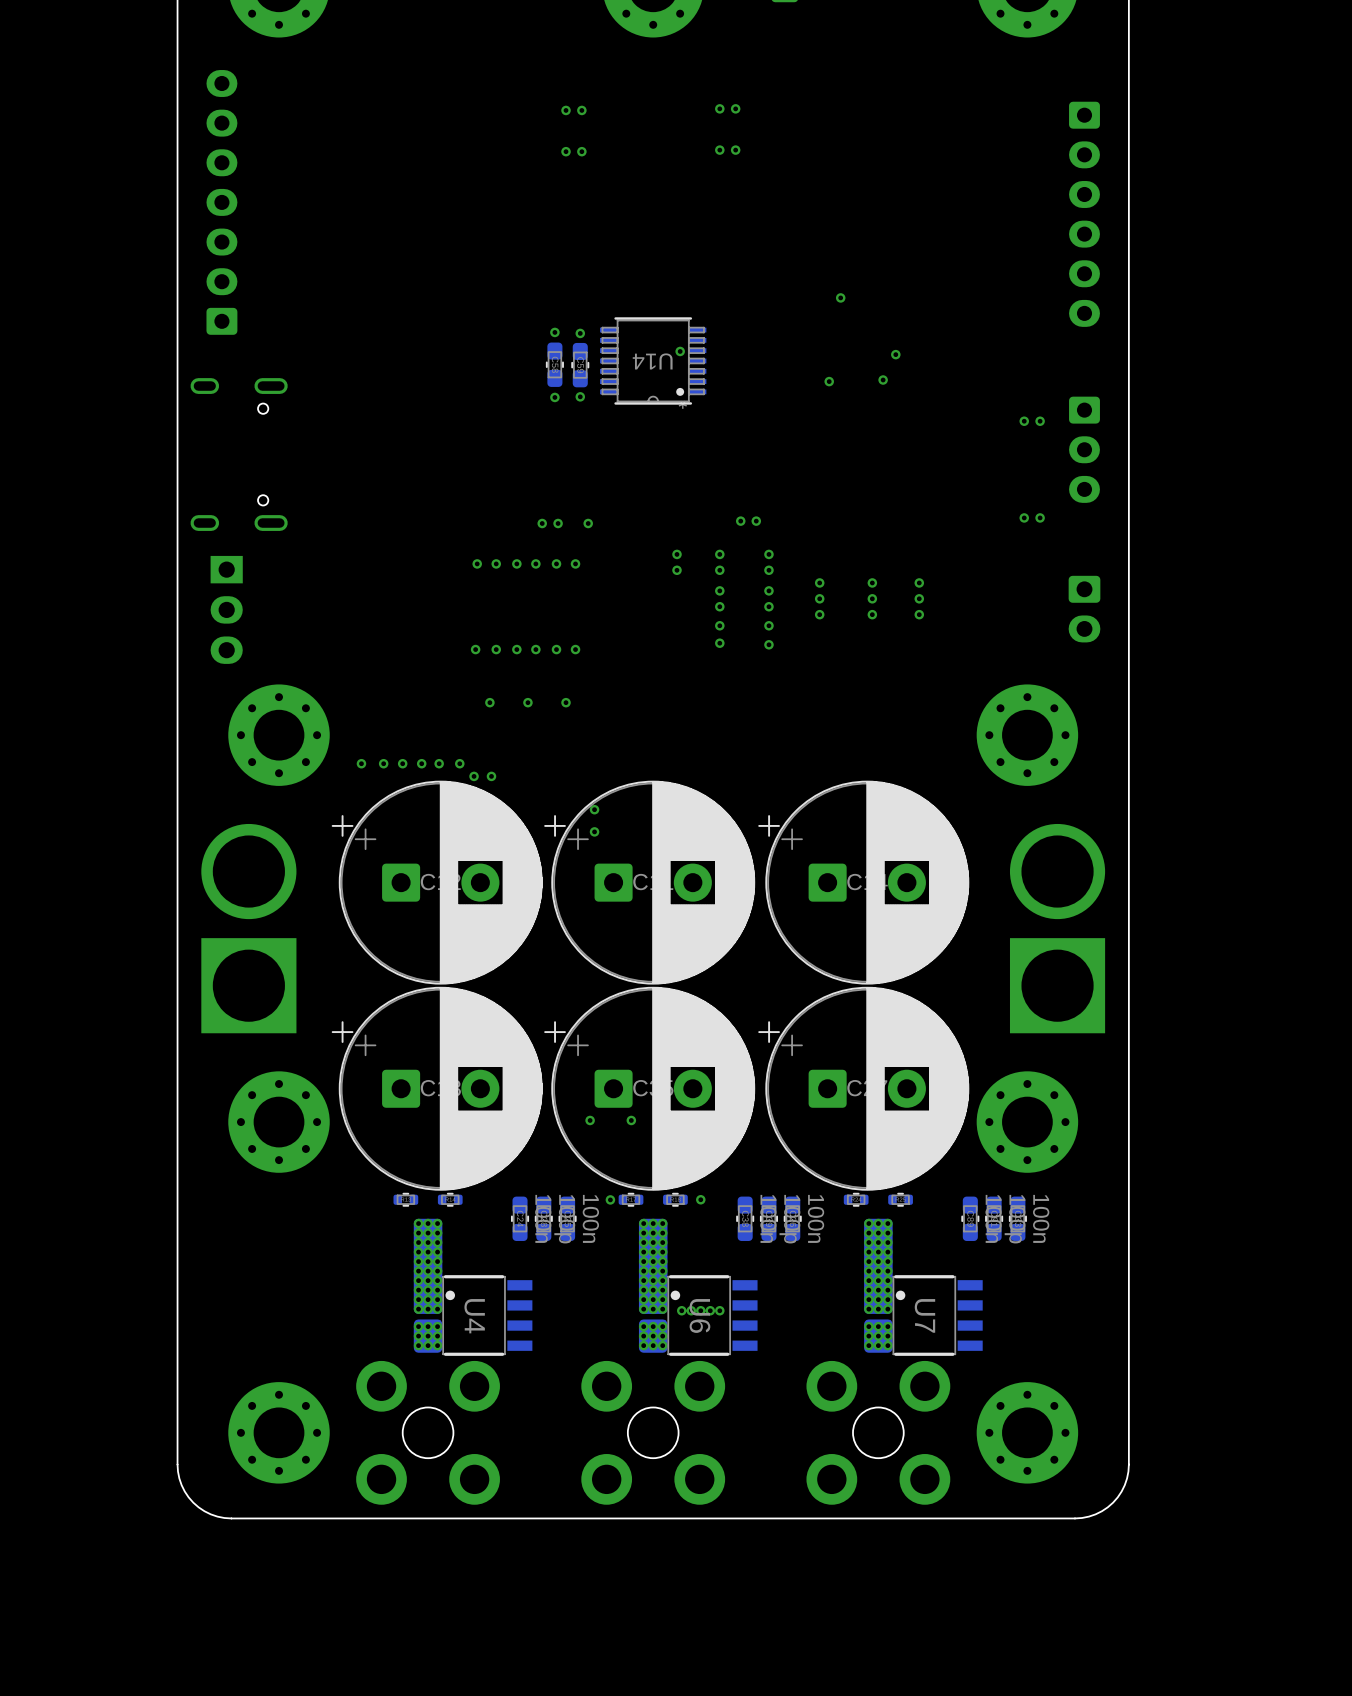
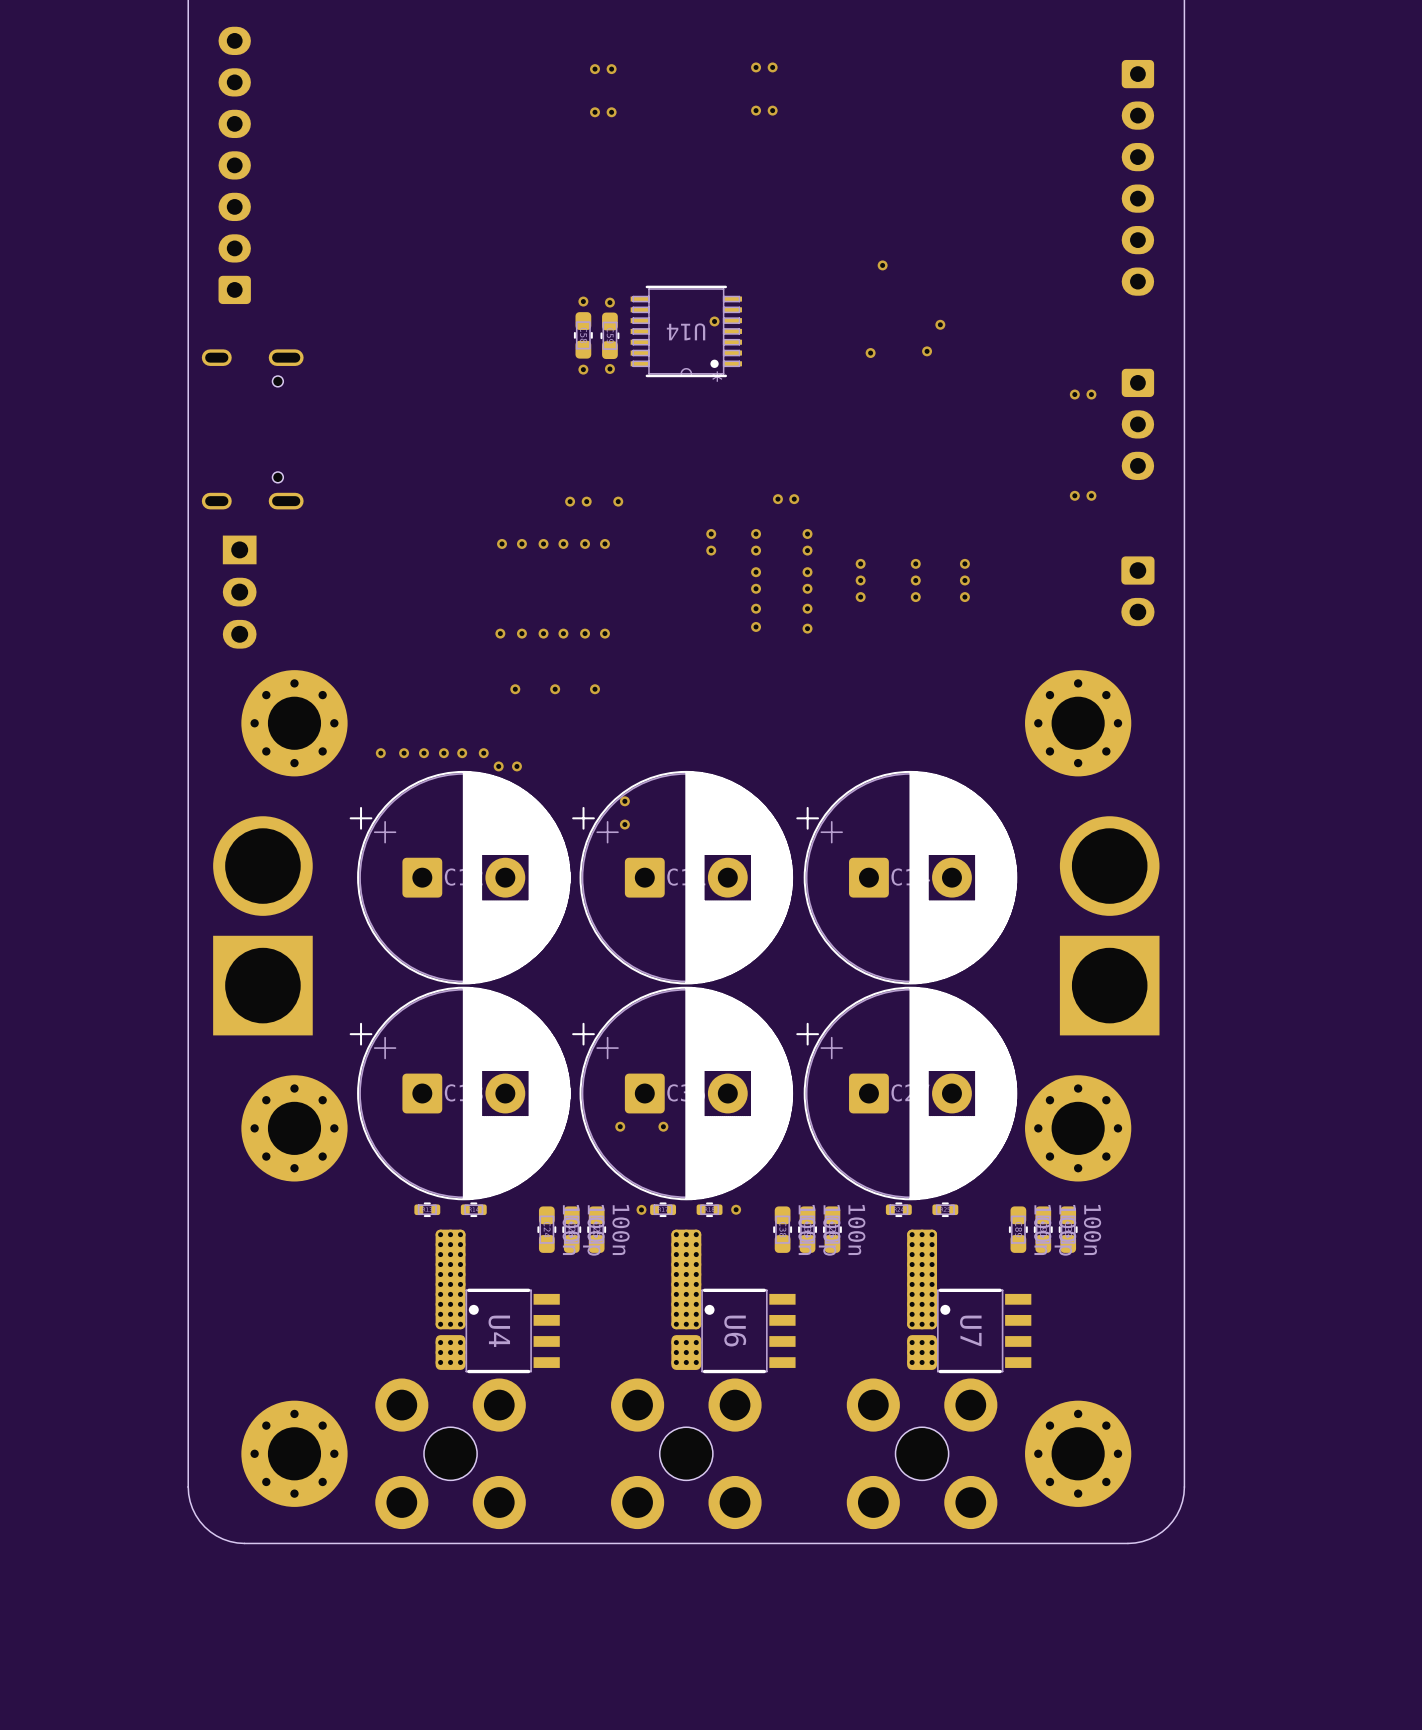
via: (681, 1310) -> none
via: (691, 1310) -> none
via: (700, 1310) -> none
via: (710, 1310) -> none
via: (719, 1310) -> none

